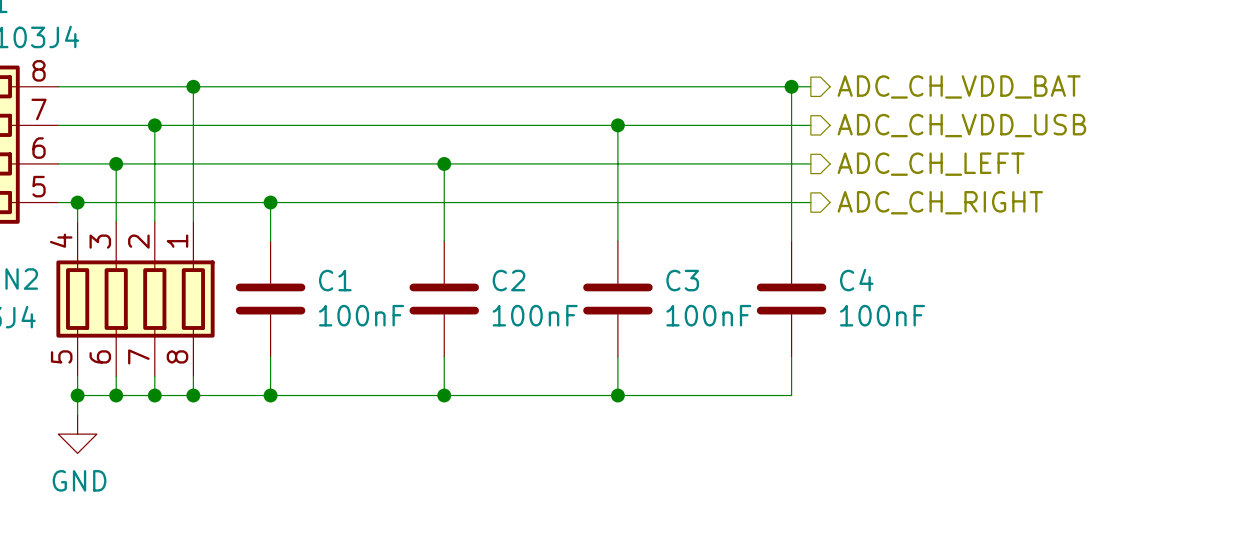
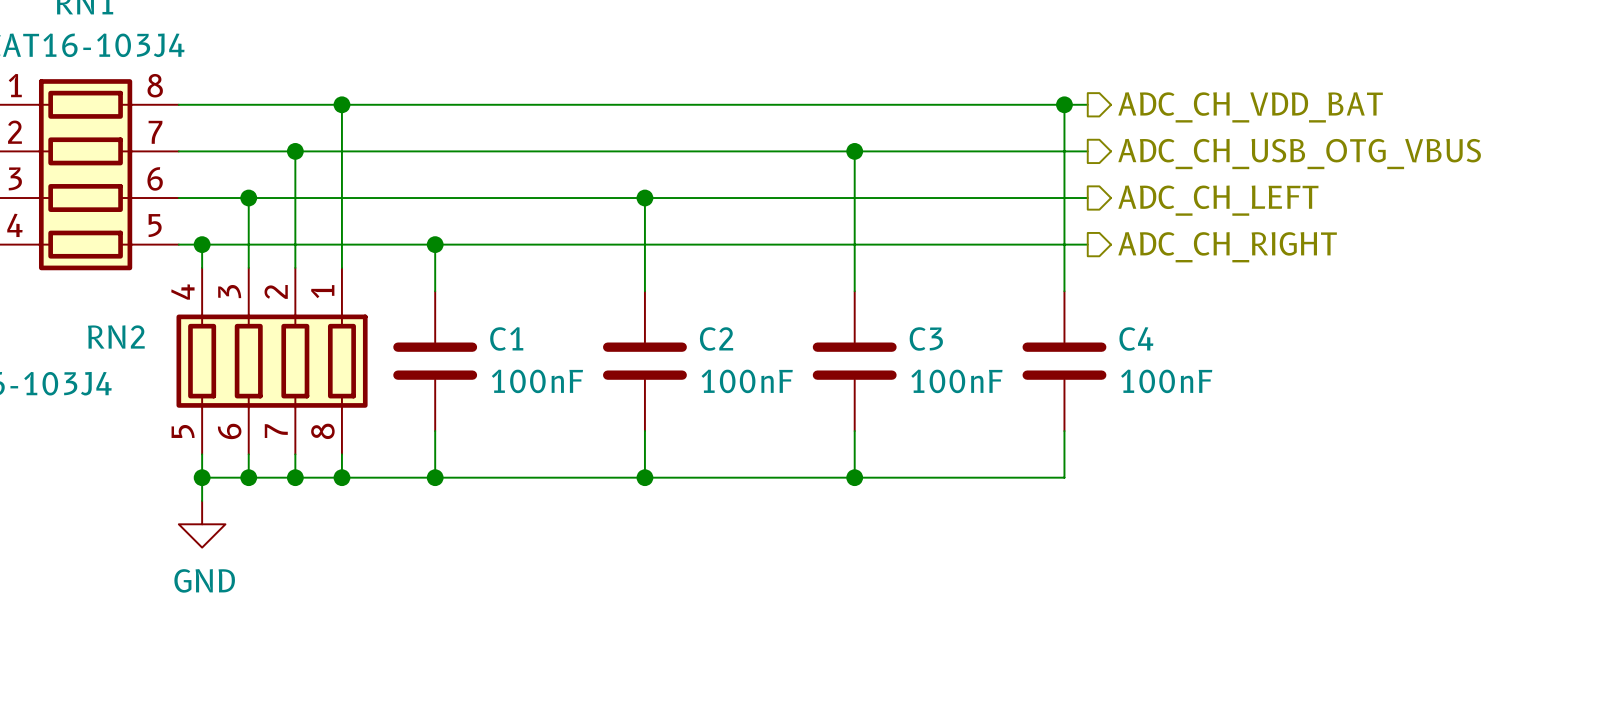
hierarchical label: ADC_CH_VDD_USB (961, 125) -> ADC_CH_USB_OTG_VBUS (1299, 154)

